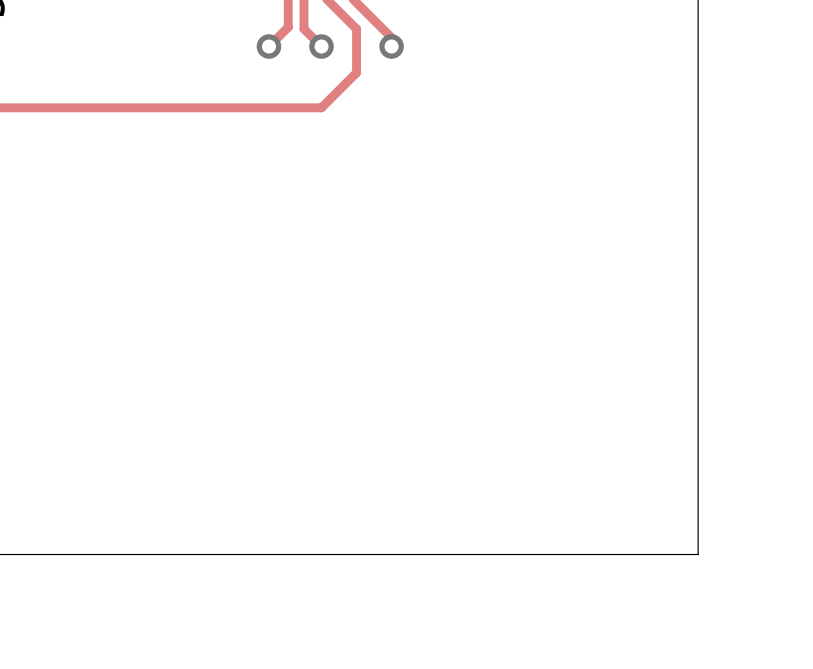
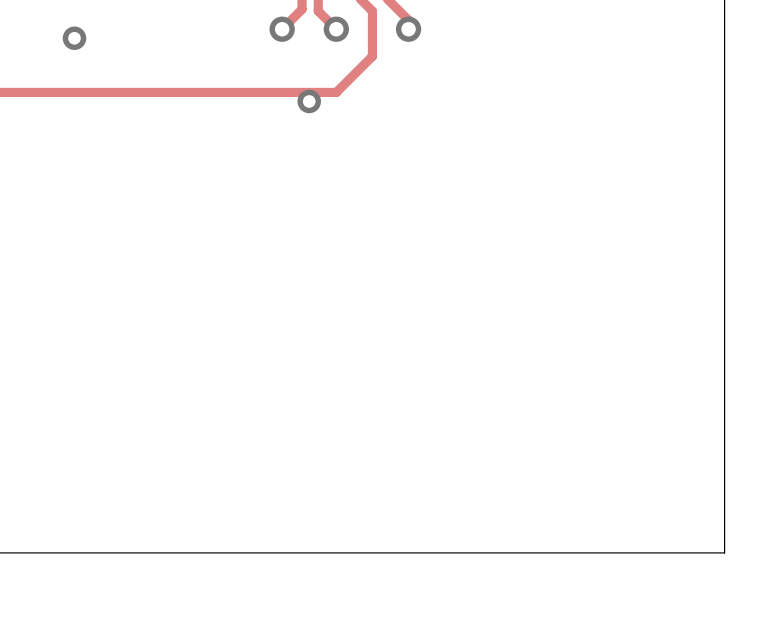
via: none -> (74, 38)
via: none -> (309, 101)

